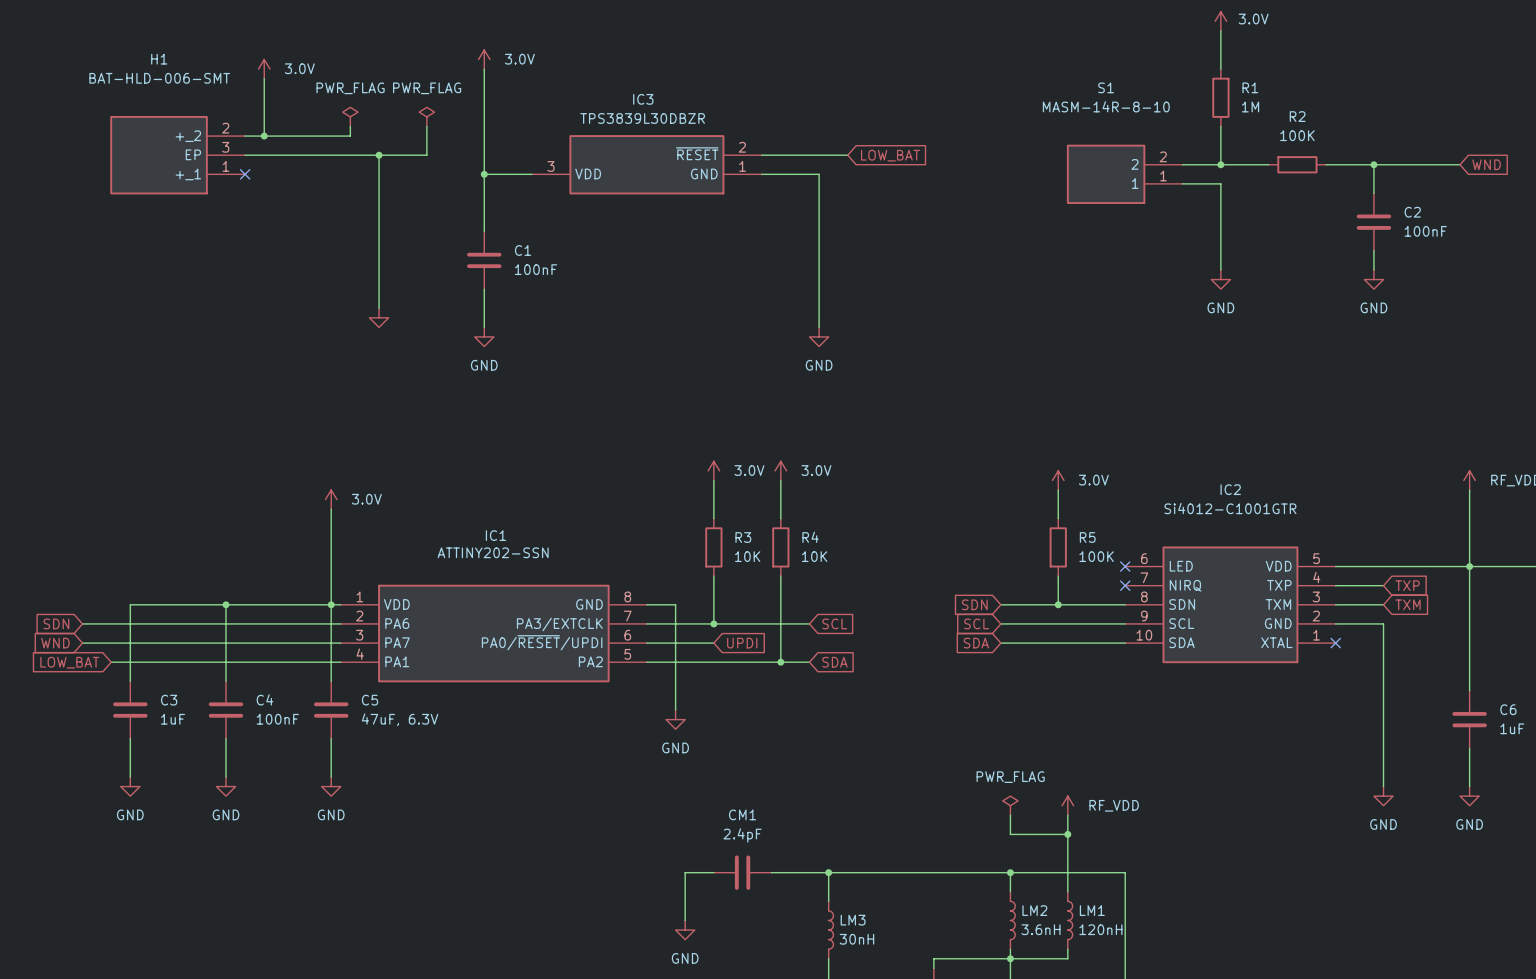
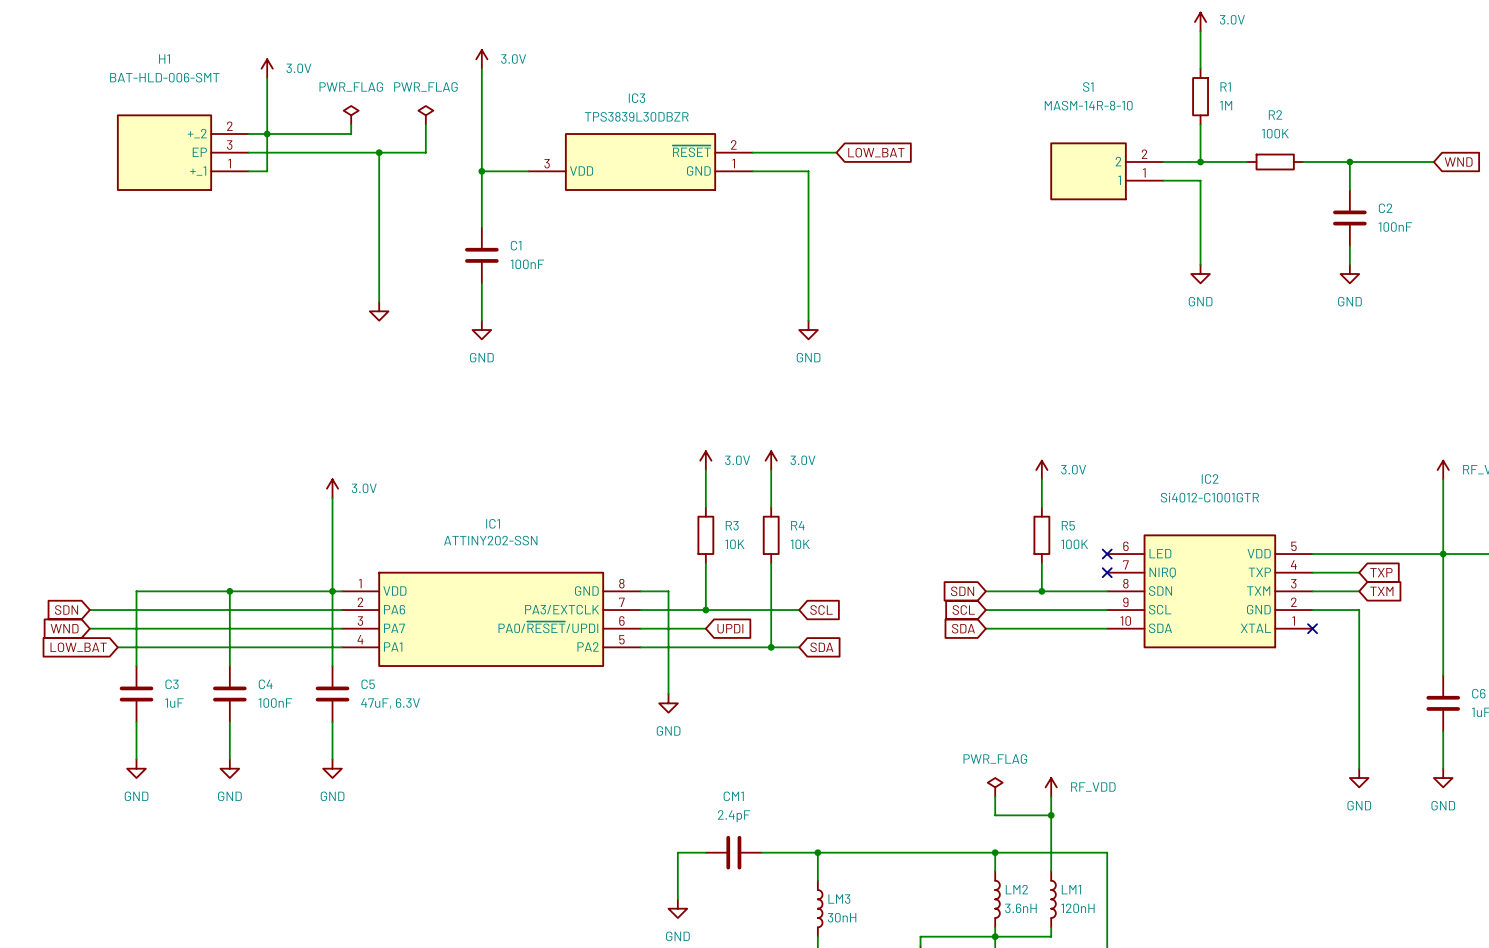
wire: none -> (267, 134) (267, 171) (248, 171)
no-connect mark: (245, 174) -> none

